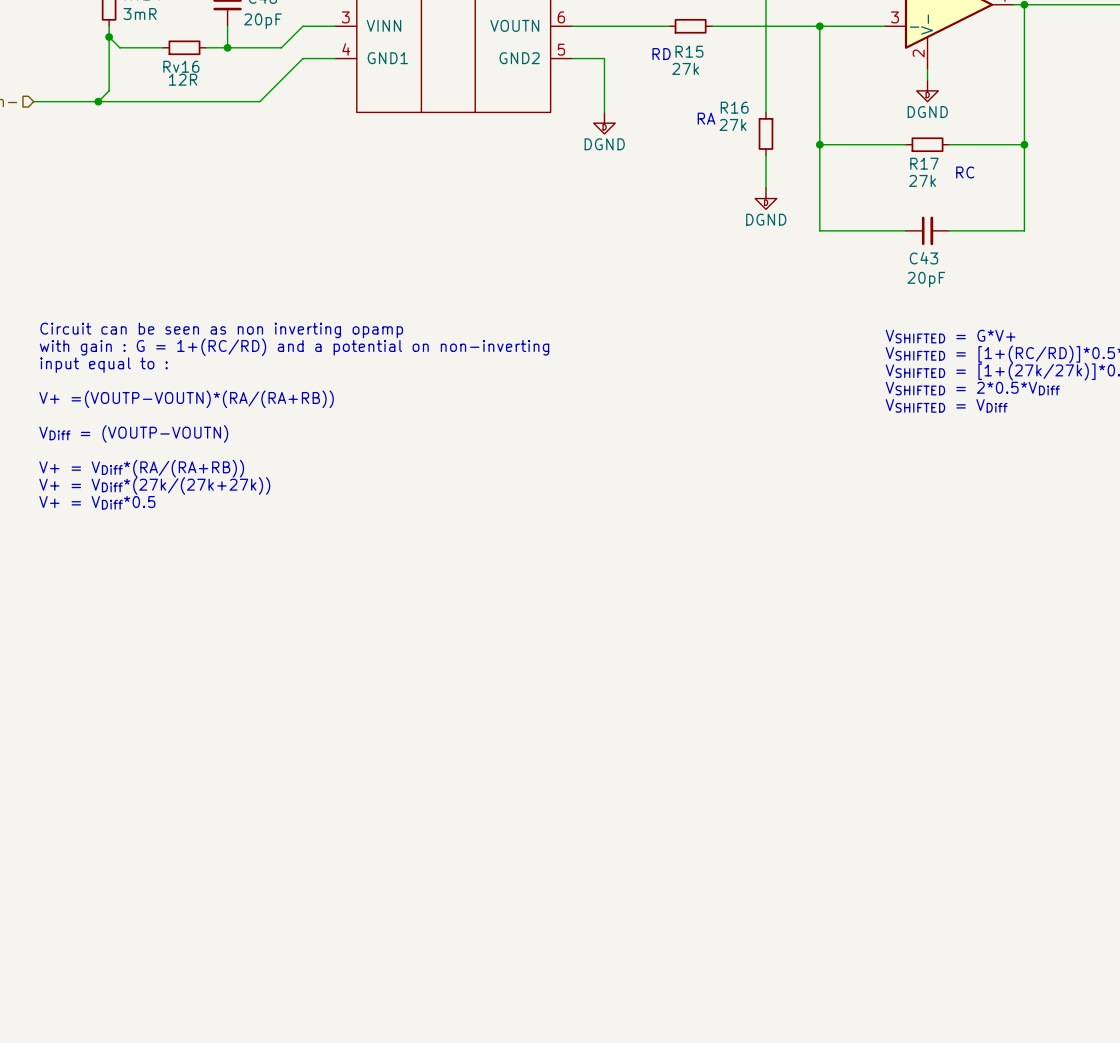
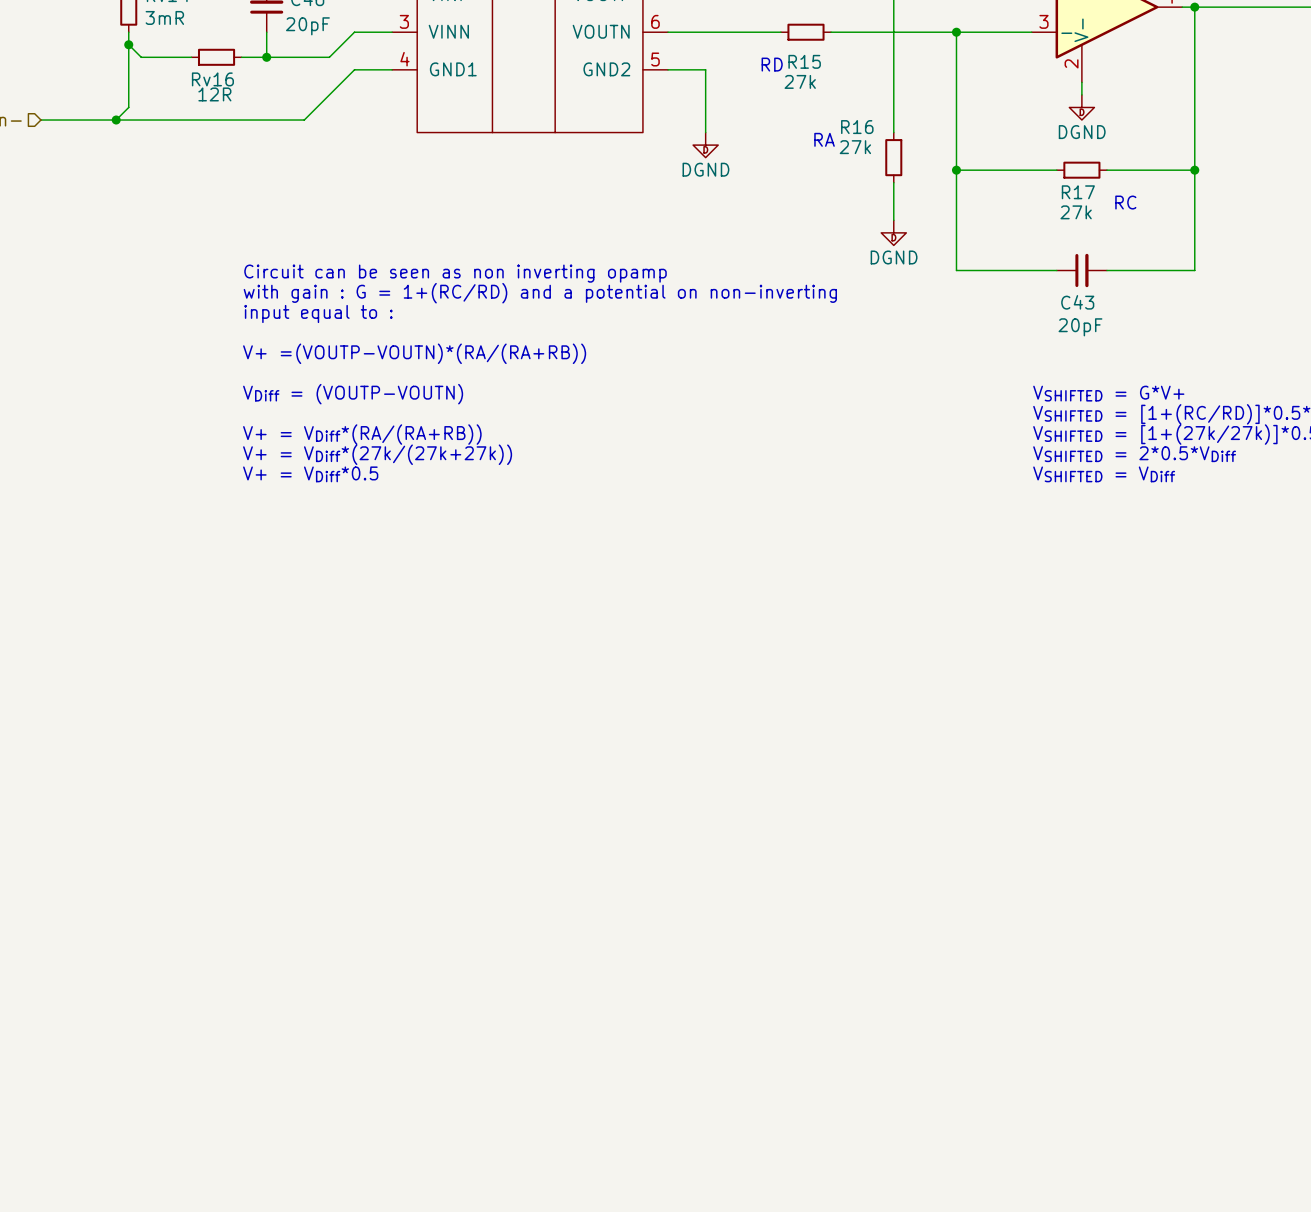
text position: Circuit can be seen as non inverting opamp (221, 330) -> Circuit can be seen as non inverting opamp (455, 273)
text position: with gain : G = 1+(RC/RD) and a potential on non-inverting (294, 347) -> with gain : G = 1+(RC/RD) and a potential on non-inverting (540, 293)
text position: input equal to : (104, 365) -> input equal to : (318, 313)
text position: V+ =(VOUTP-VOUTN)*(RA/(RA+RB)) (186, 399) -> V+ =(VOUTP-VOUTN)*(RA/(RA+RB)) (414, 353)
text position: VDiff = (VOUTP-VOUTN) (133, 433) -> VDiff = (VOUTP-VOUTN) (353, 394)
text position: V+ = VDiff*(RA/(RA+RB)) (141, 468) -> V+ = VDiff*(RA/(RA+RB)) (362, 434)
text position: V+ = VDiff*(27k/(27k+27k)) (154, 485) -> V+ = VDiff*(27k/(27k+27k)) (377, 454)
text position: V+ = VDiff*0.5 (97, 502) -> V+ = VDiff*0.5 (310, 474)

